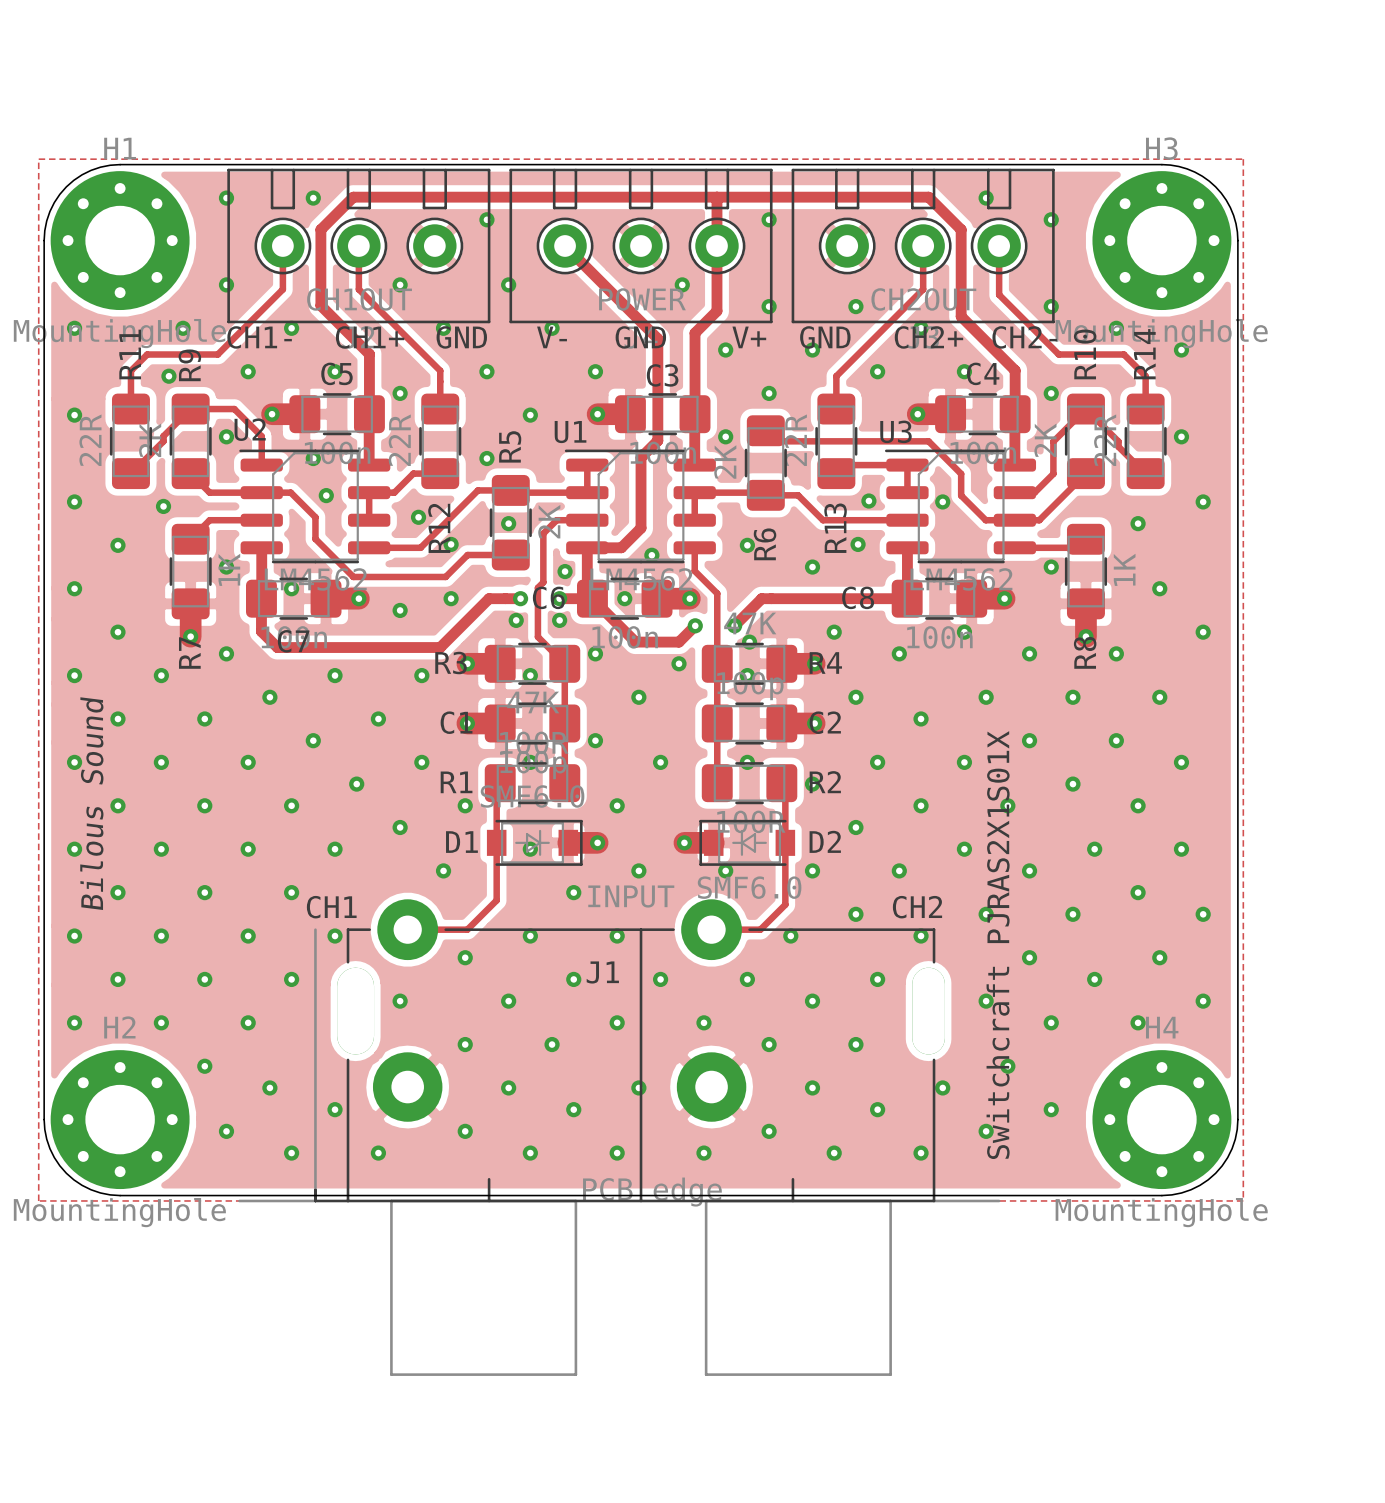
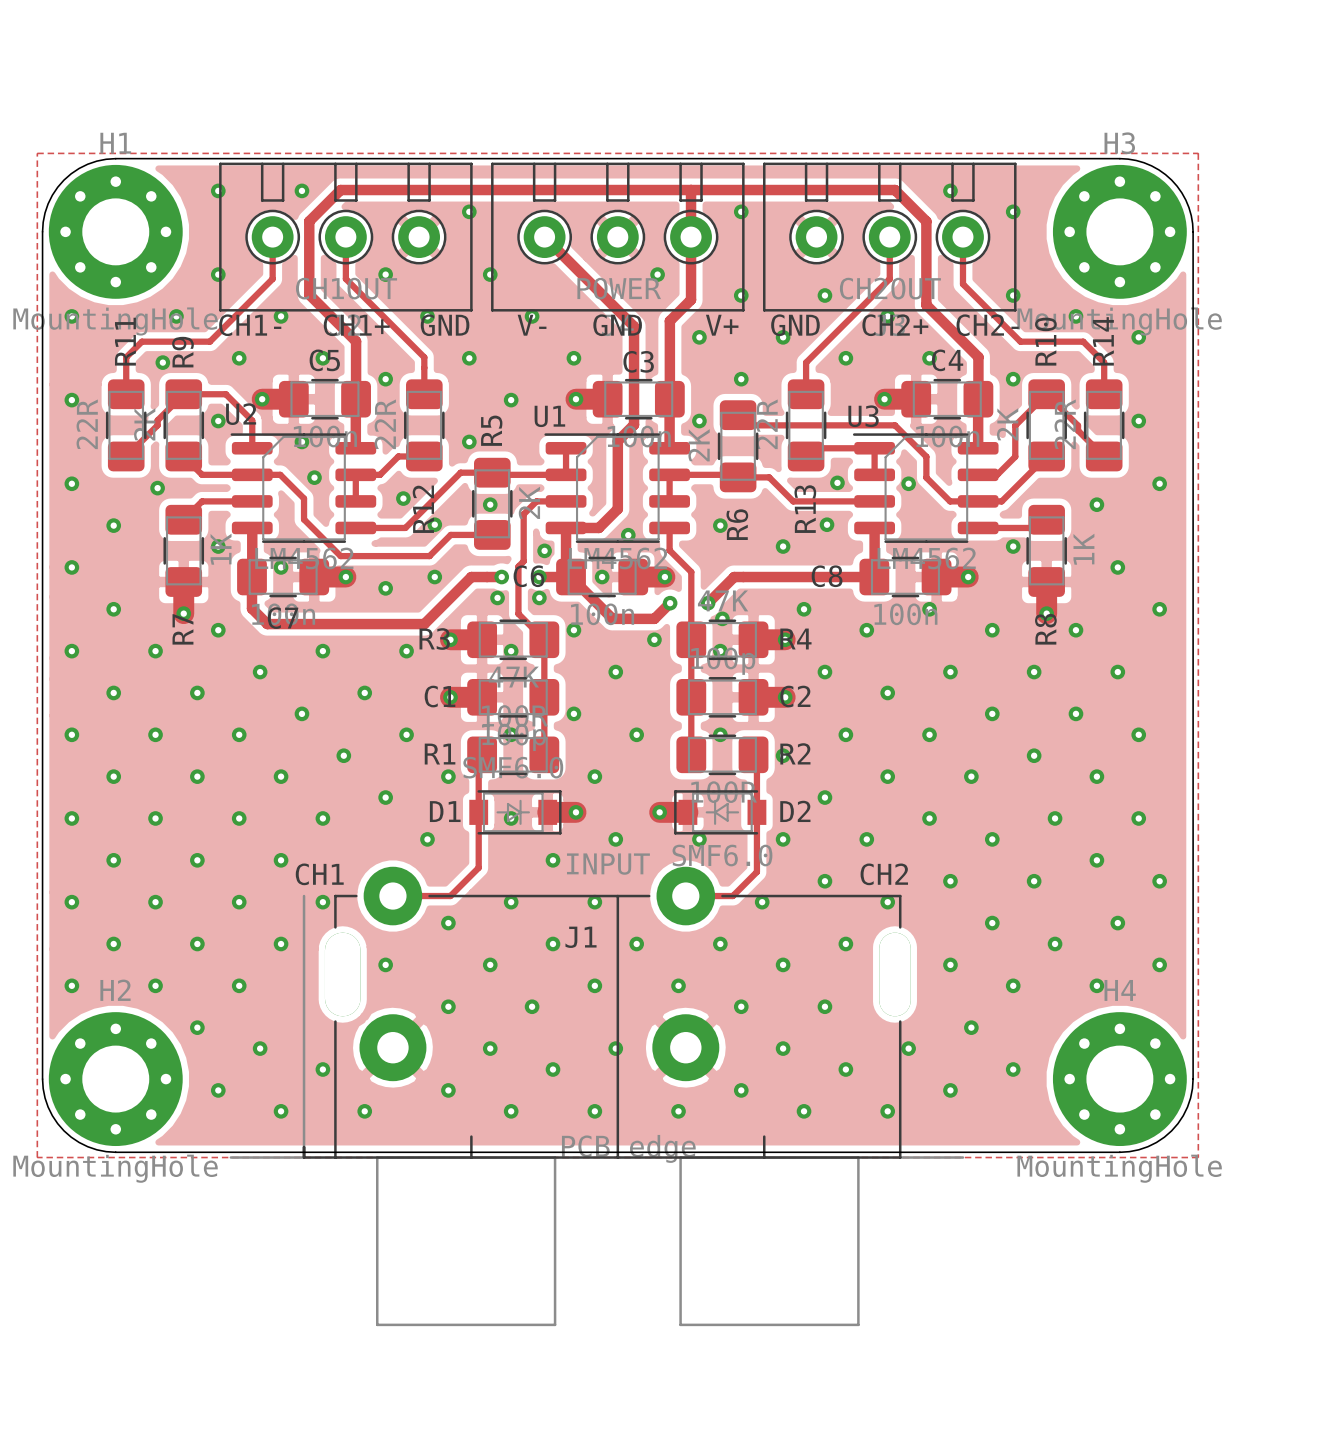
text: Bilous Sound (91, 803) -> none
text: Switchcraft PJRAS2X1S01X (998, 945) -> none

